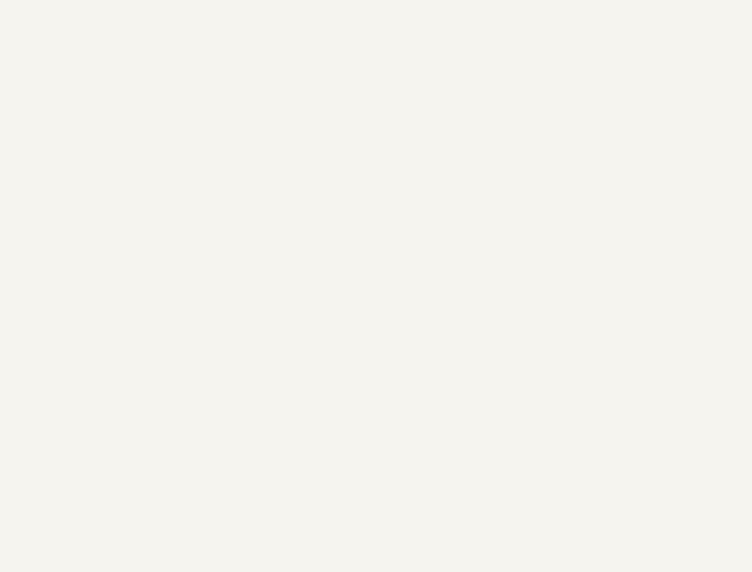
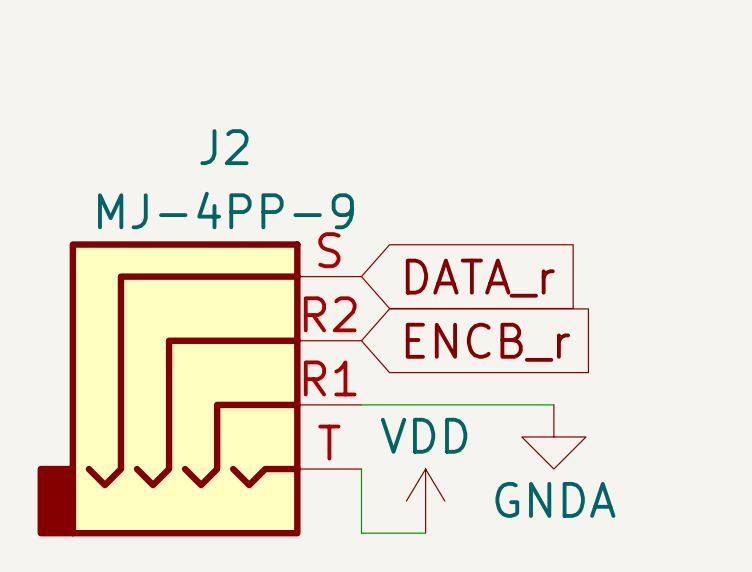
global label: none -> DATA_r (480, 278)
global label: none -> ENCB_r (487, 342)
J2: none -> MJ-4PP-9 (199, 388)
wire: none -> (361, 404) (553, 404)
power symbol: none -> GNDA (553, 436)
wire: none -> (361, 469) (361, 533) (425, 533)
power symbol: none -> VDD (425, 501)

